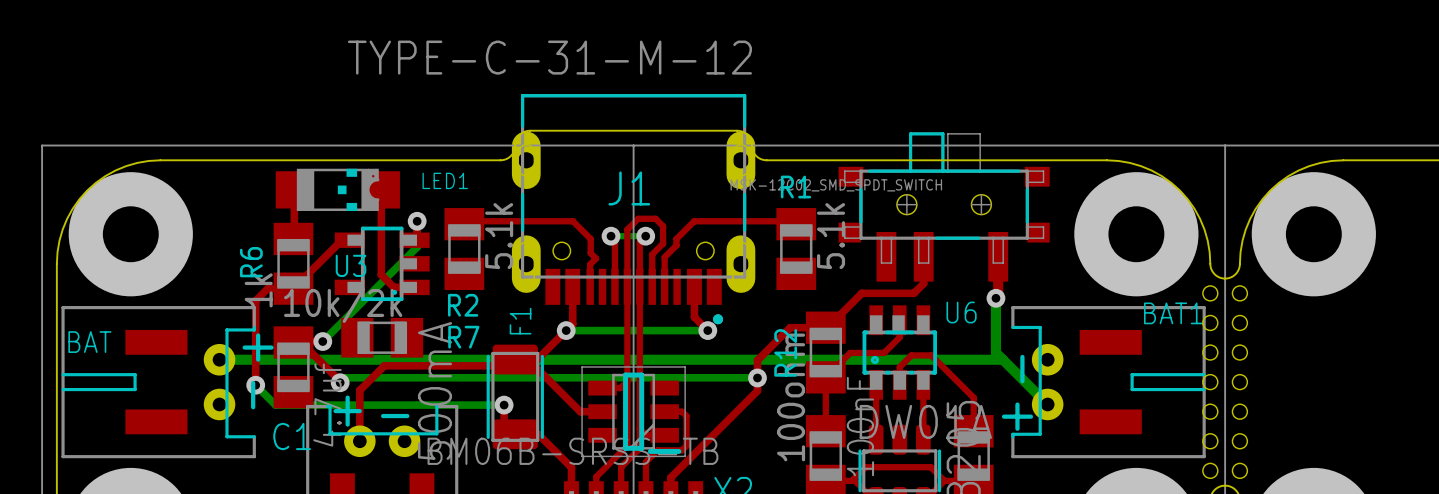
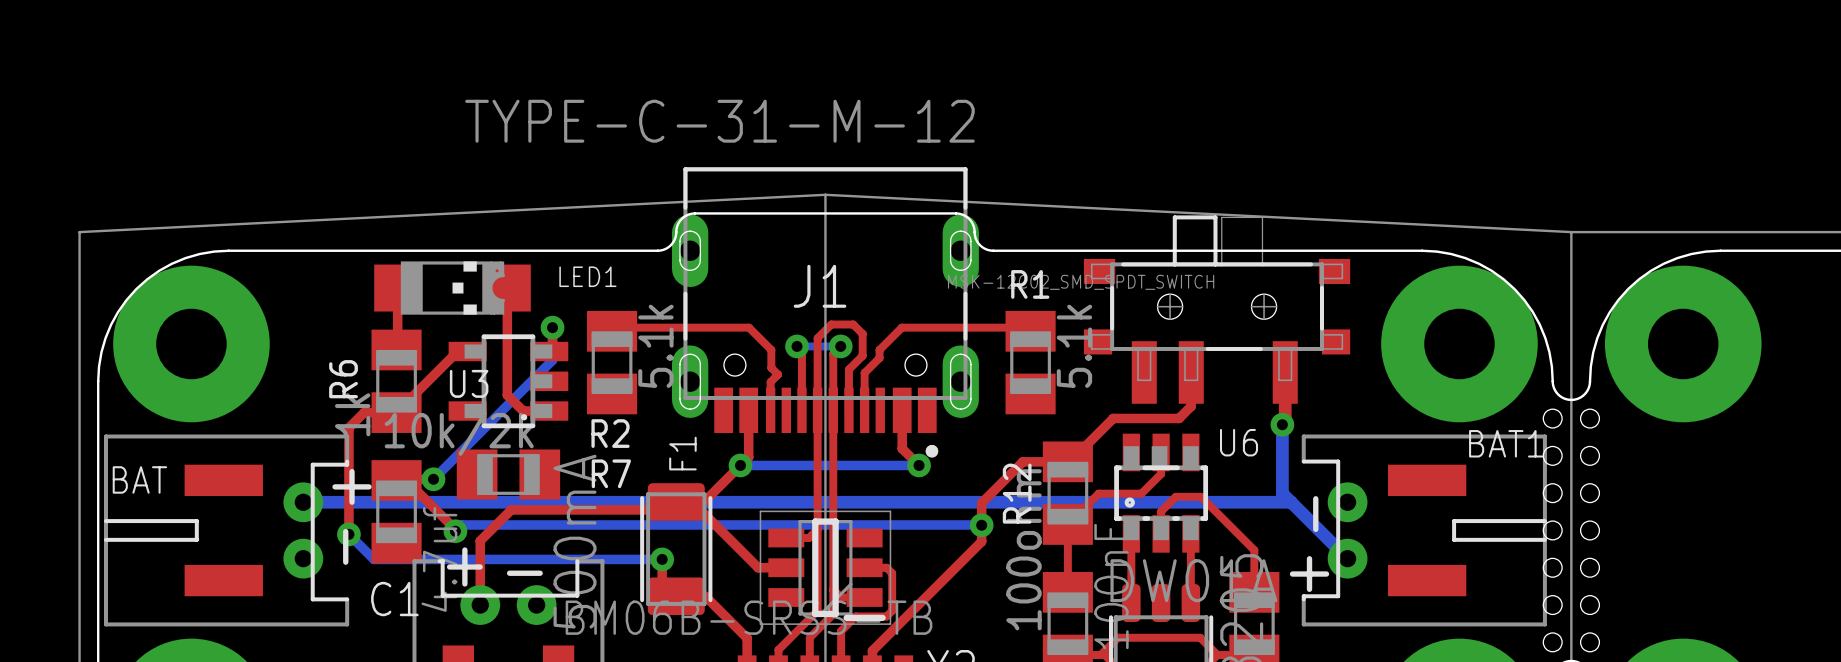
line: none -> (825, 194) (1571, 232)
line: none -> (825, 194) (825, 232)
line: (42, 145) (1225, 145) -> (79, 232) (825, 194)

